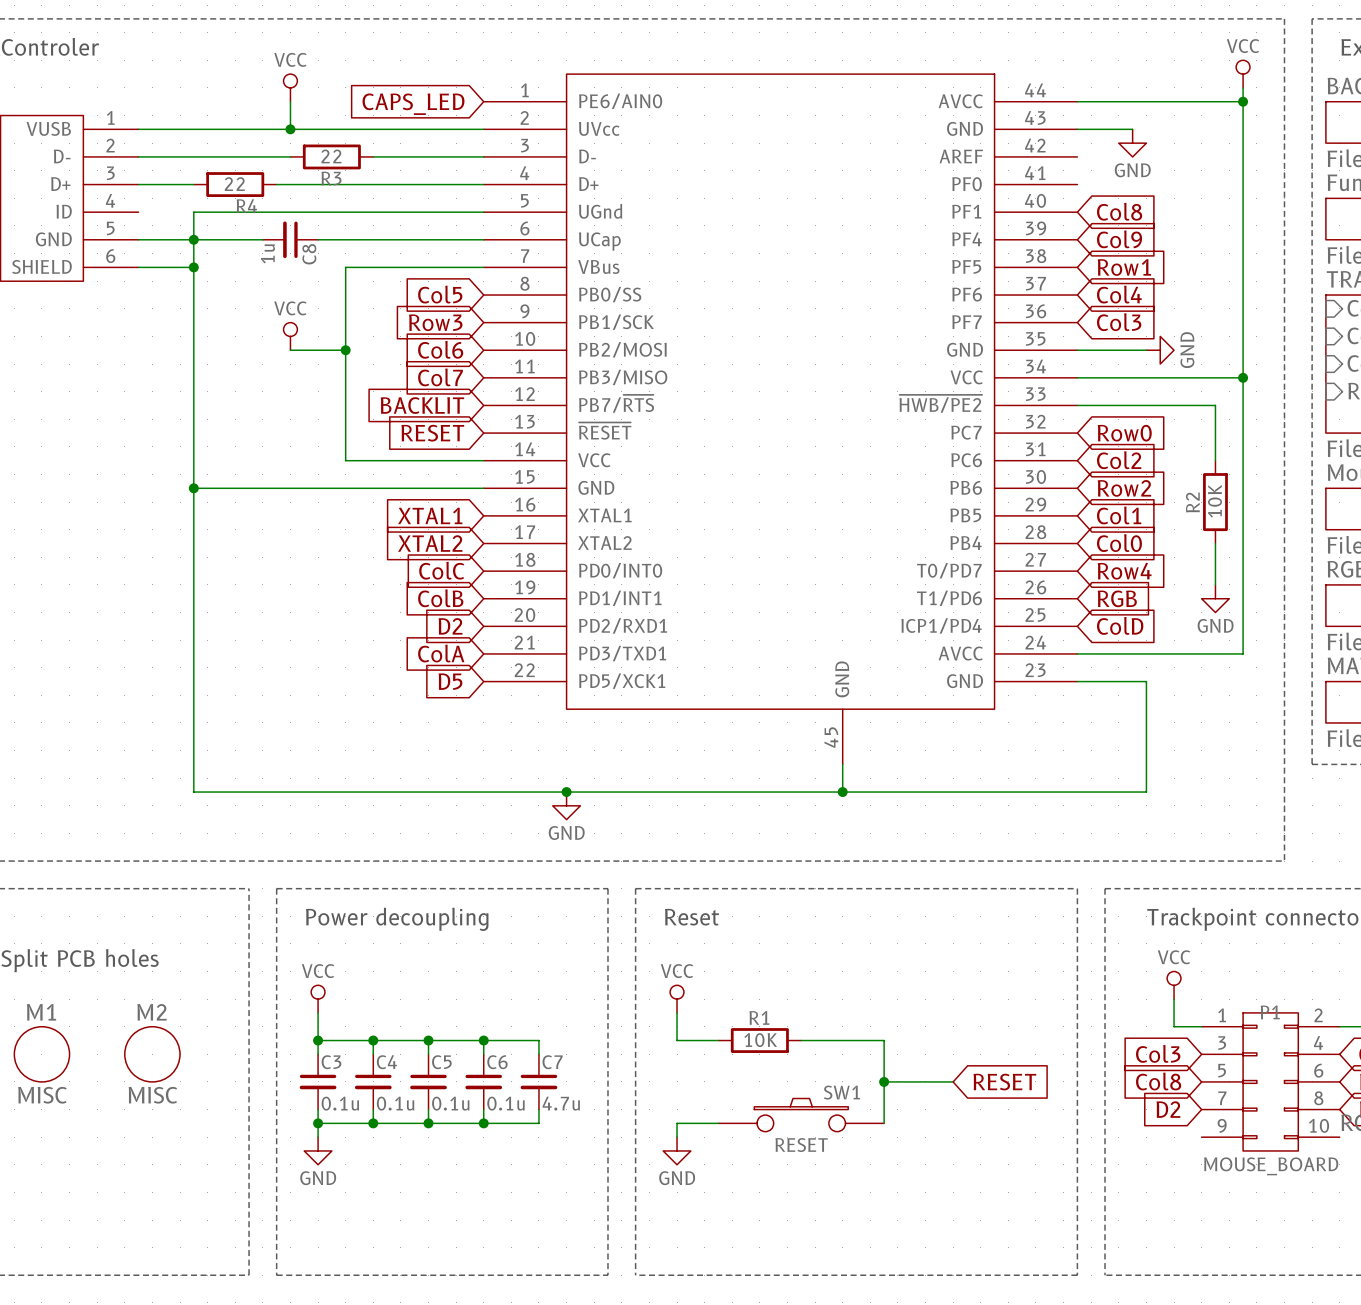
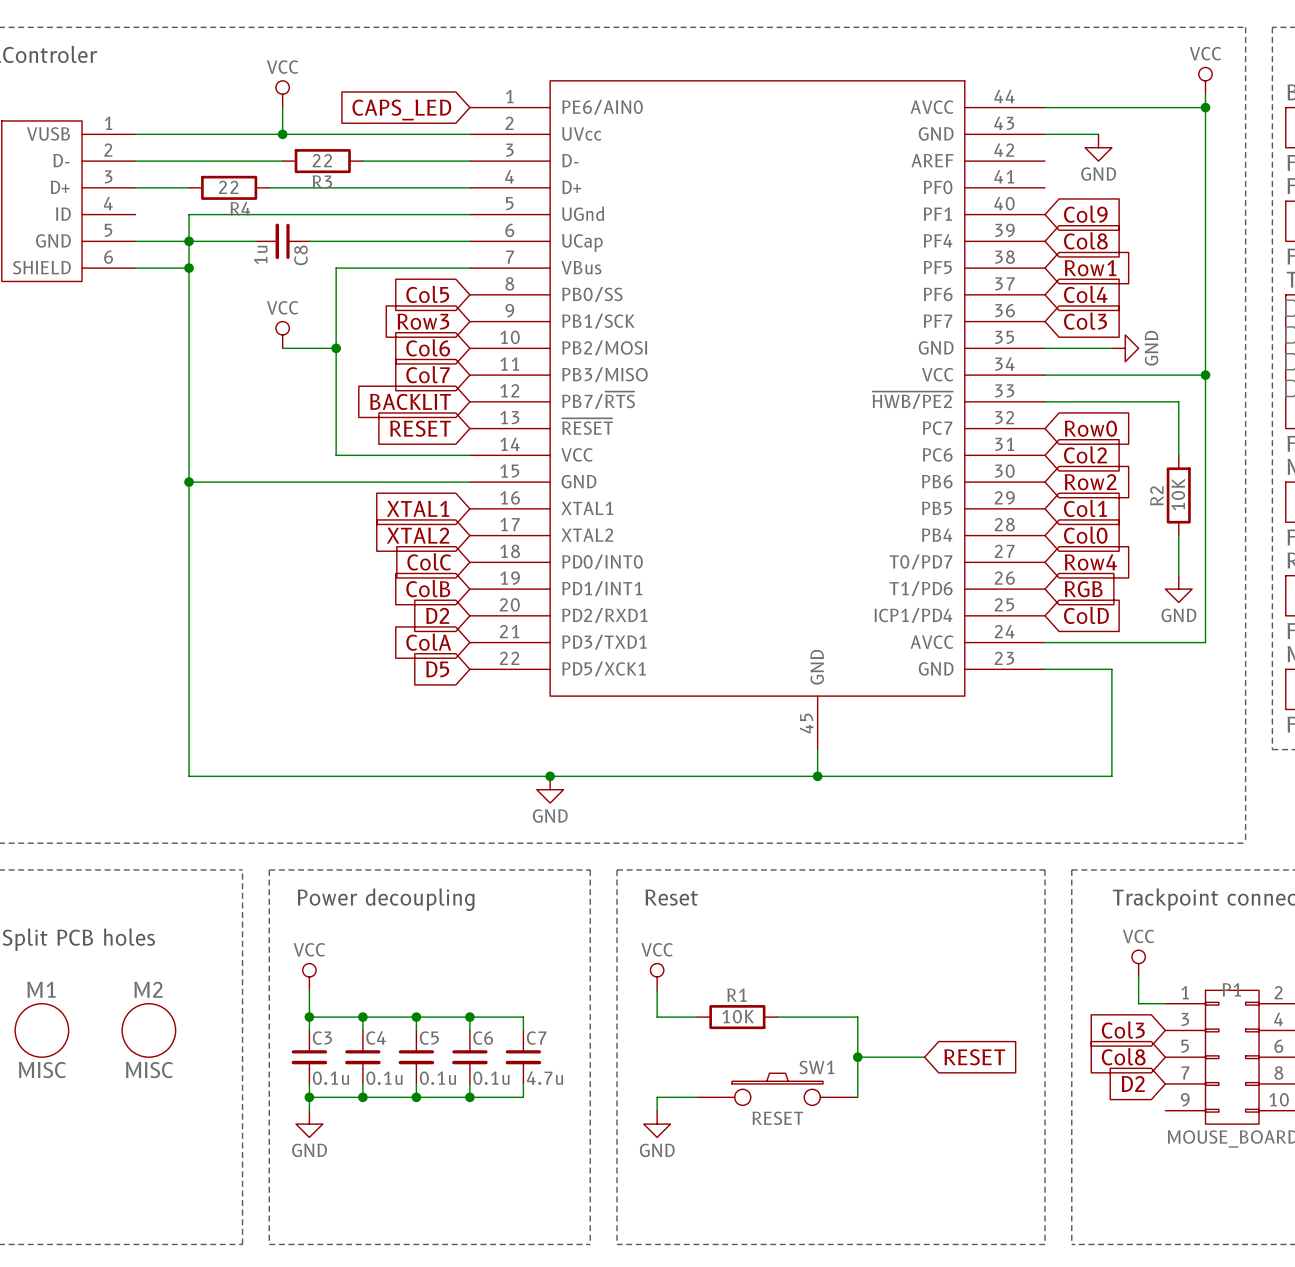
global label: Col8 (1119, 211) -> Col9 (1085, 214)
global label: Col9 (1119, 239) -> Col8 (1085, 240)

